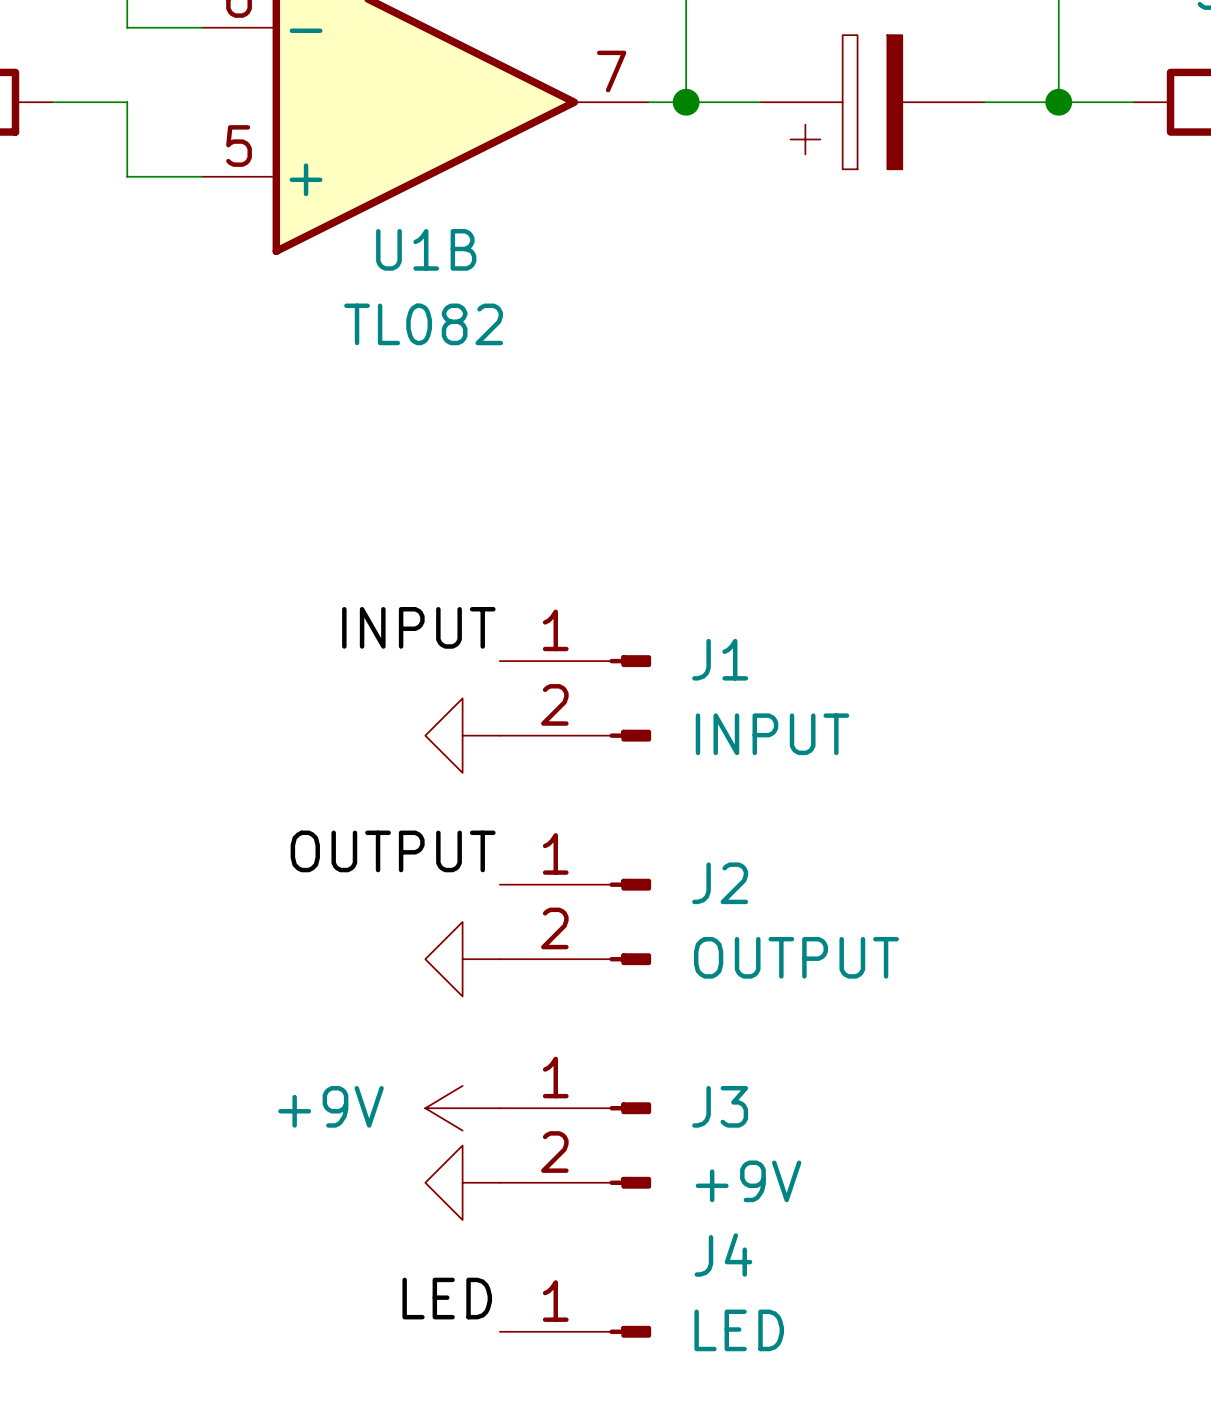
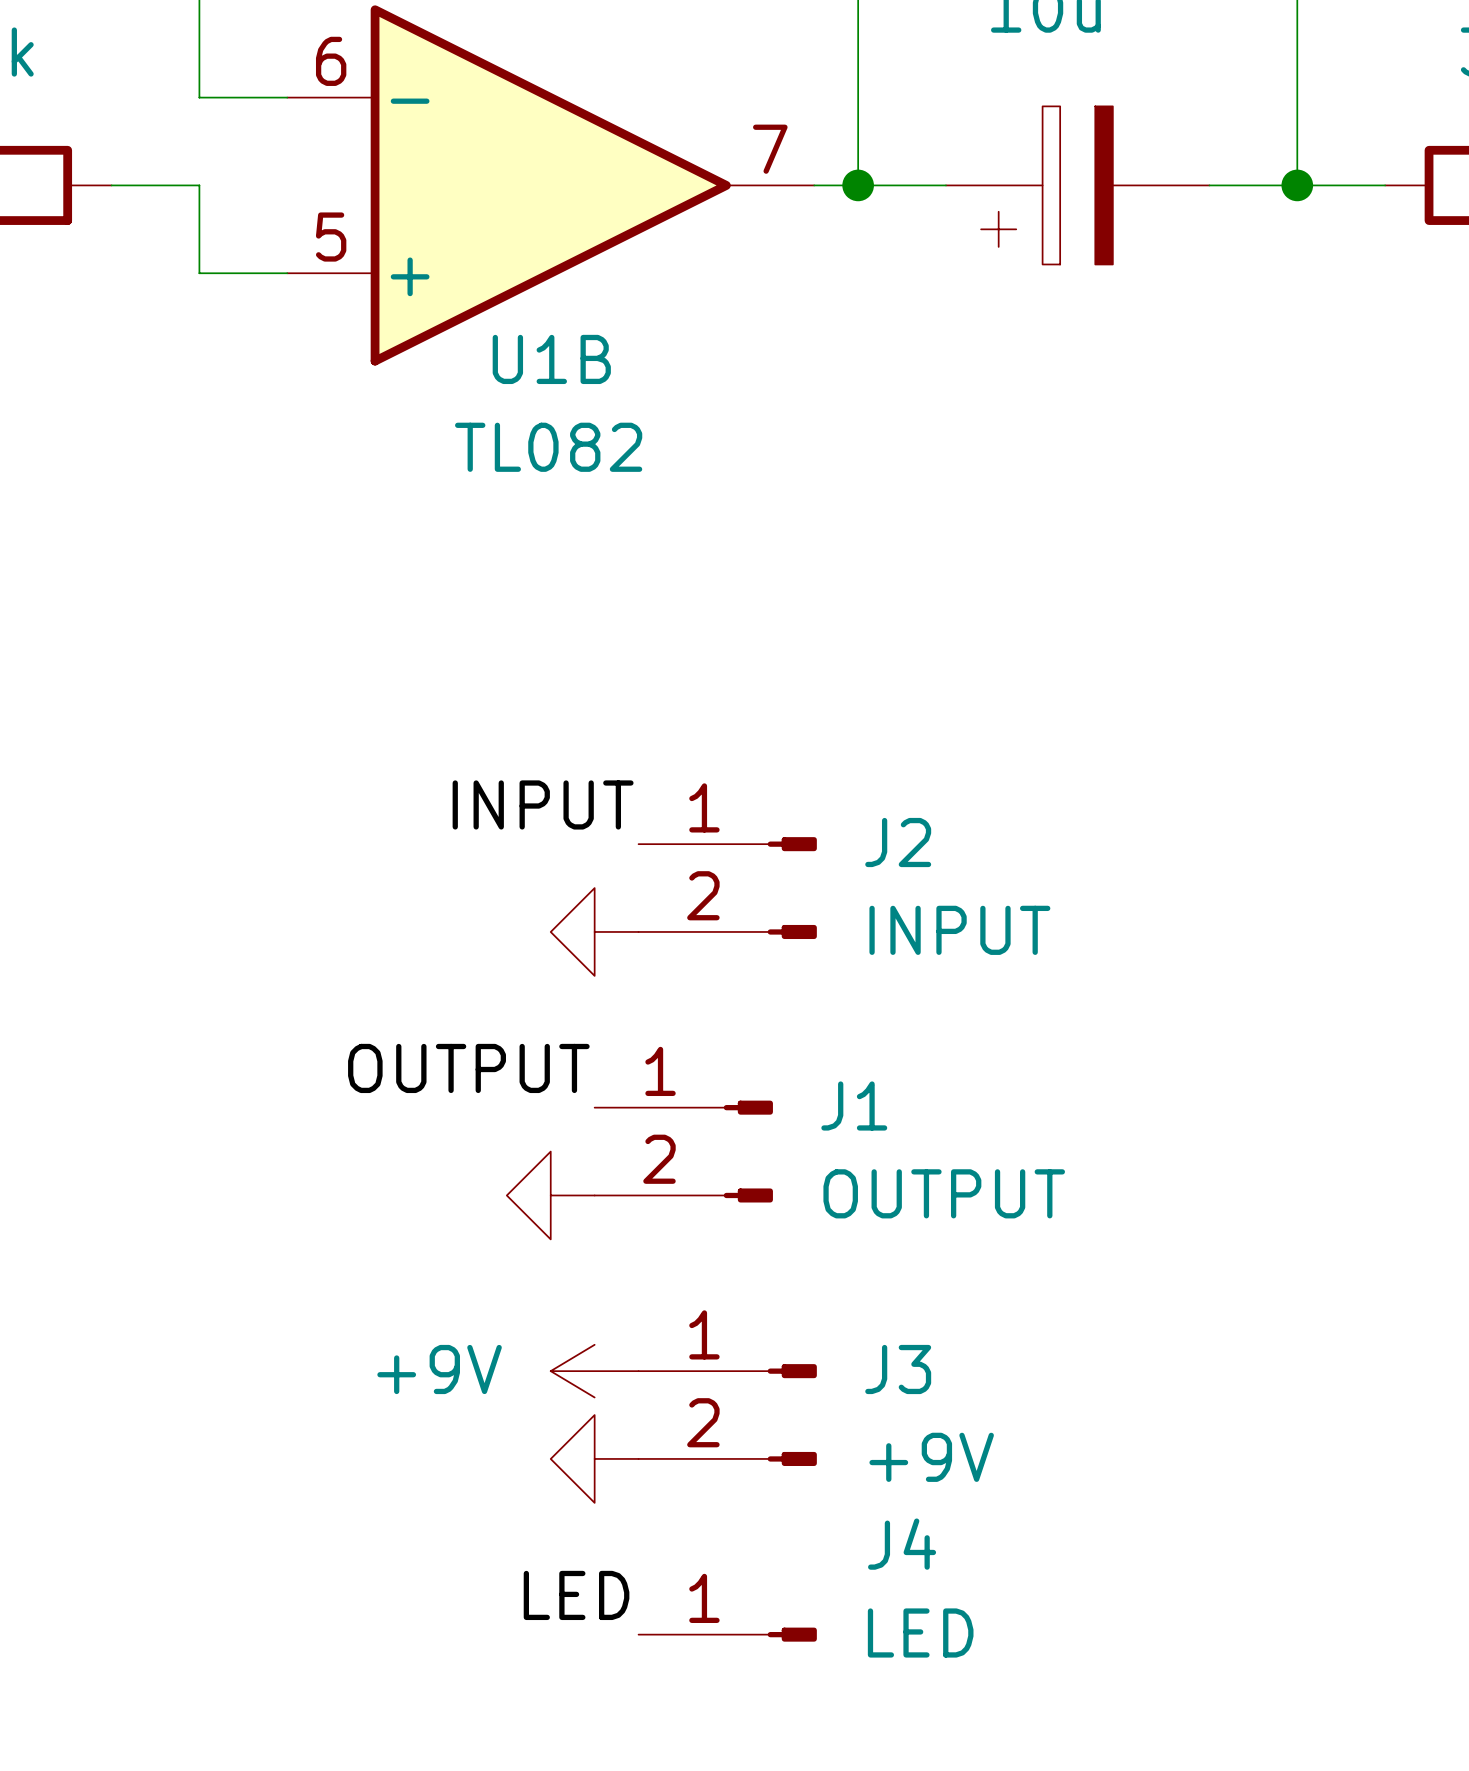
J1 name: J1 (720, 659) -> J2 (898, 842)
label position: OUTPUT (393, 851) -> OUTPUT (468, 1068)
J1: none -> OUTPUT (683, 1151)
J2: OUTPUT (575, 921) -> none
power symbol position: (462, 959) -> (550, 1195)

